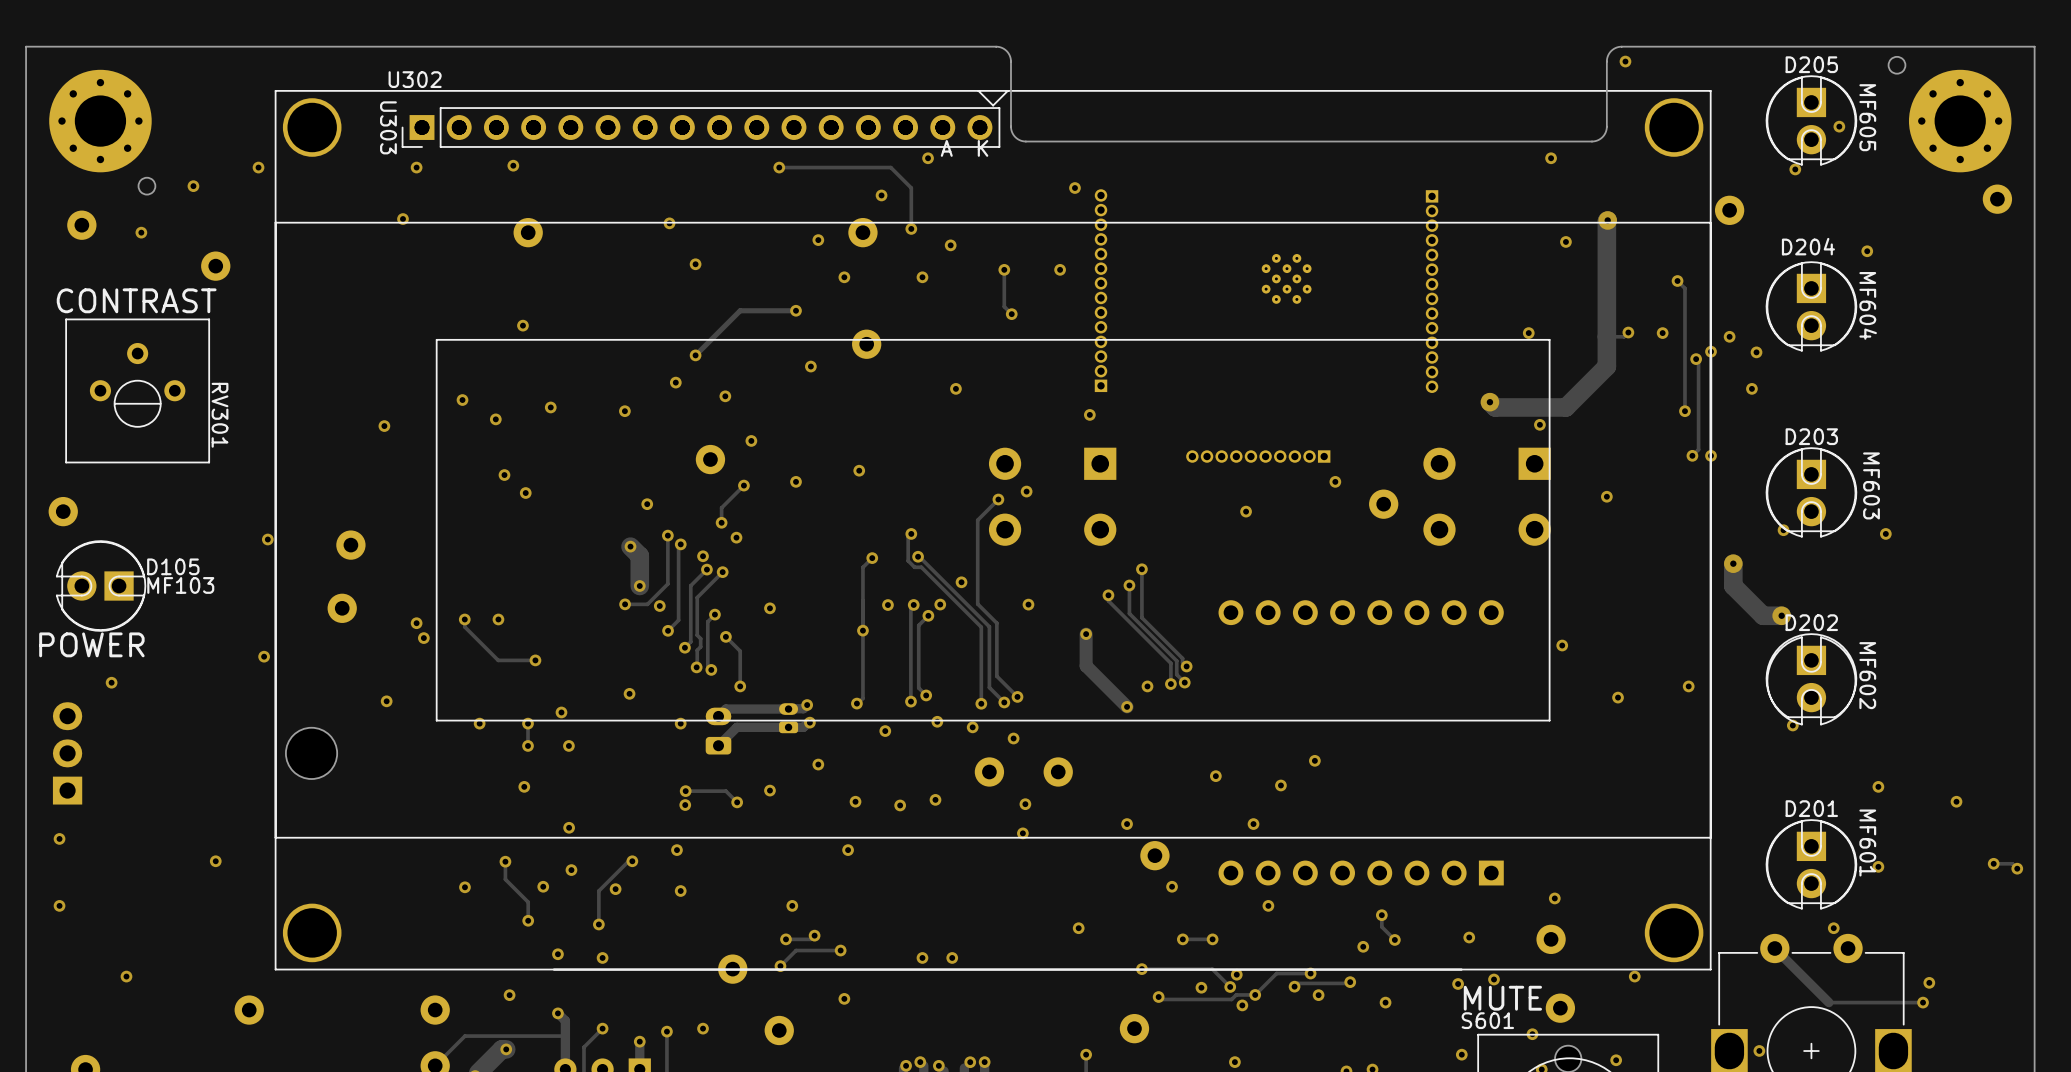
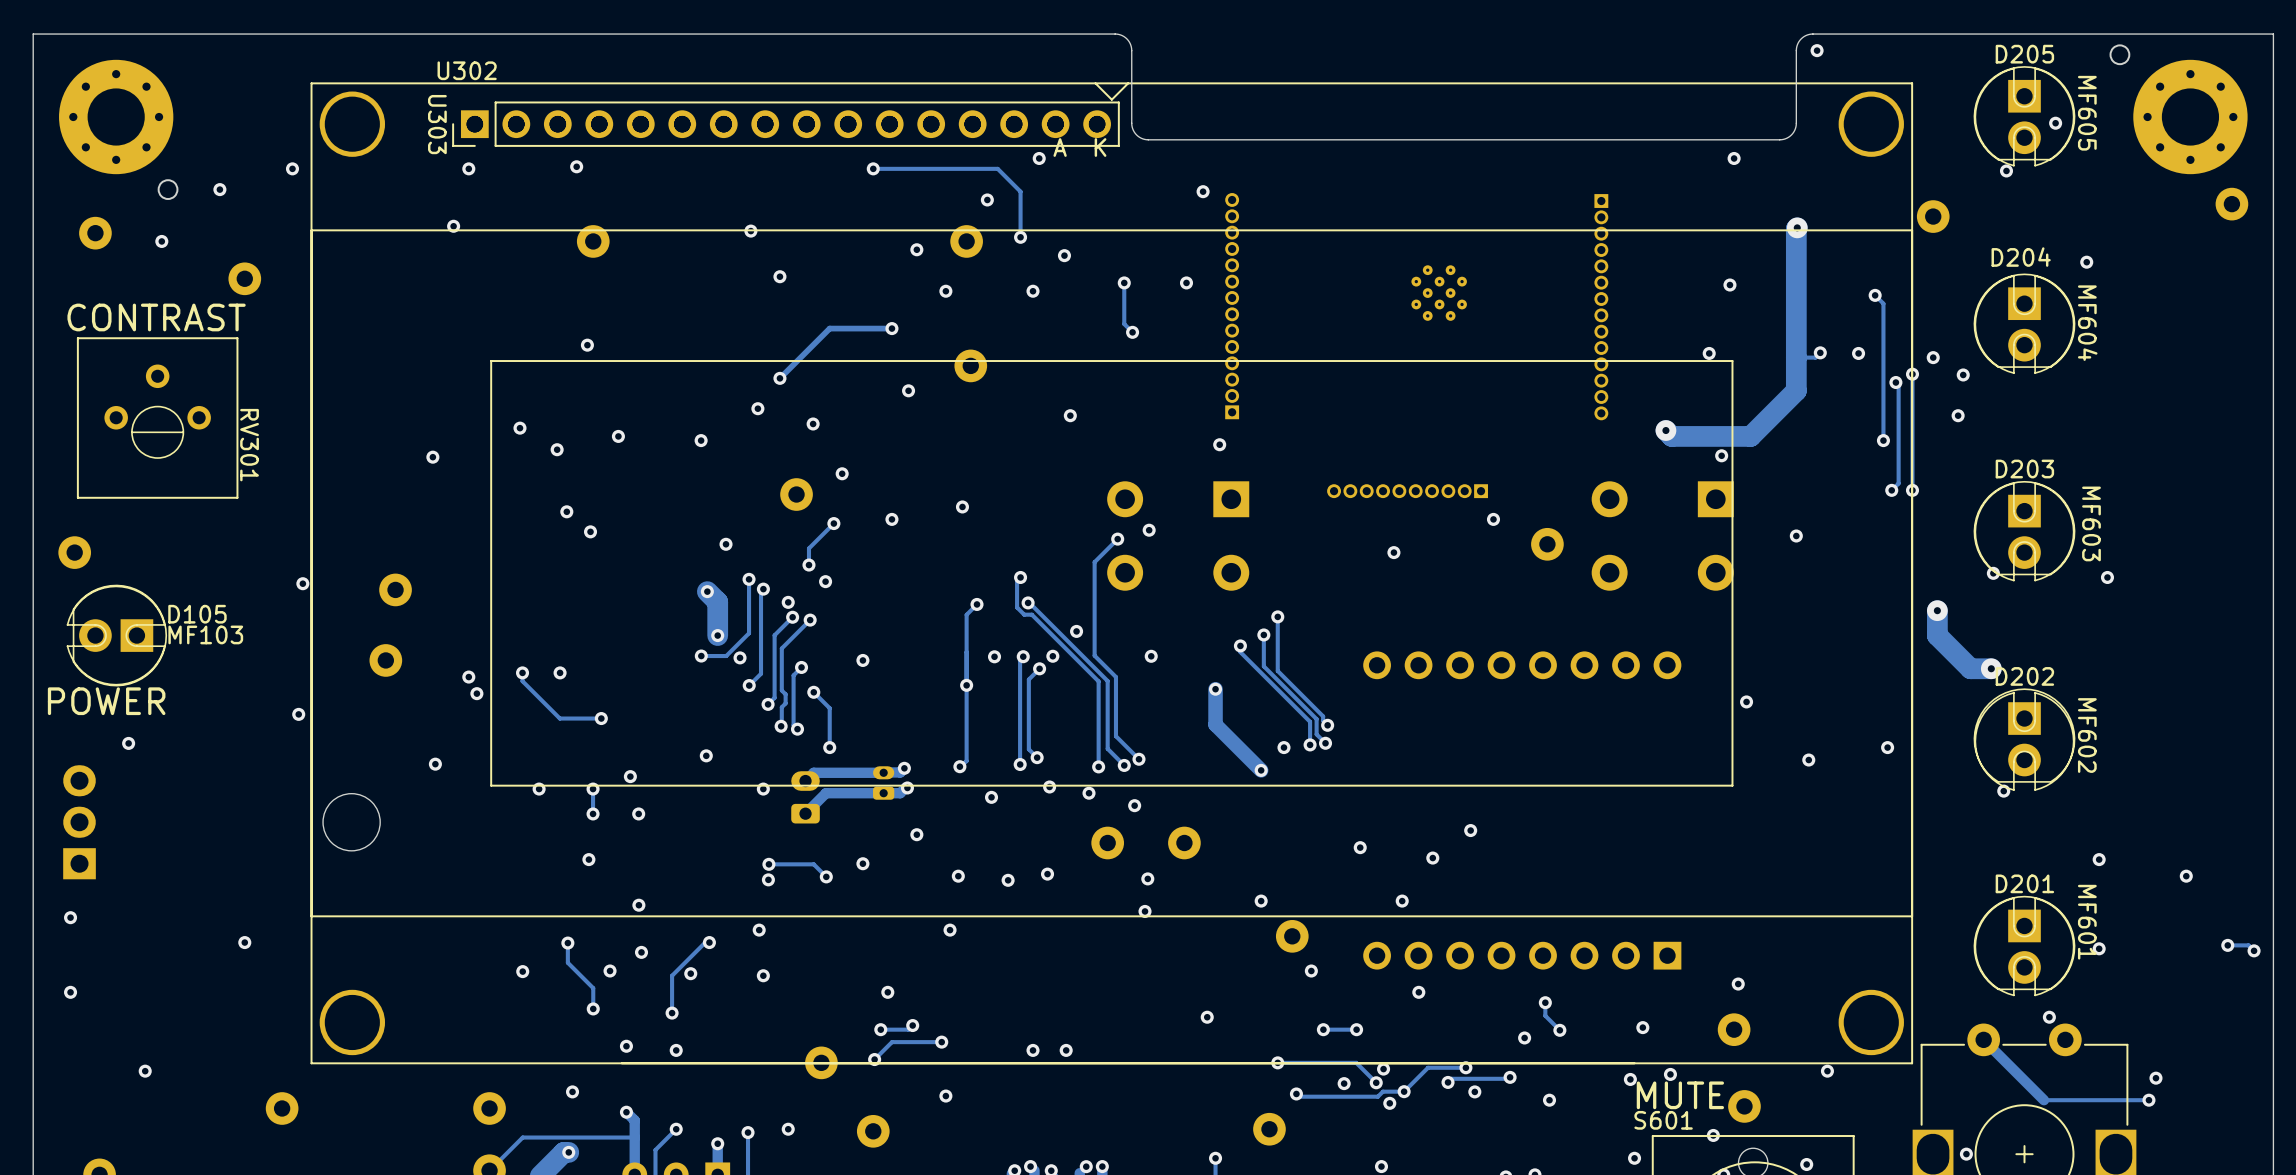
via position: (1565, 241) -> (1729, 285)

